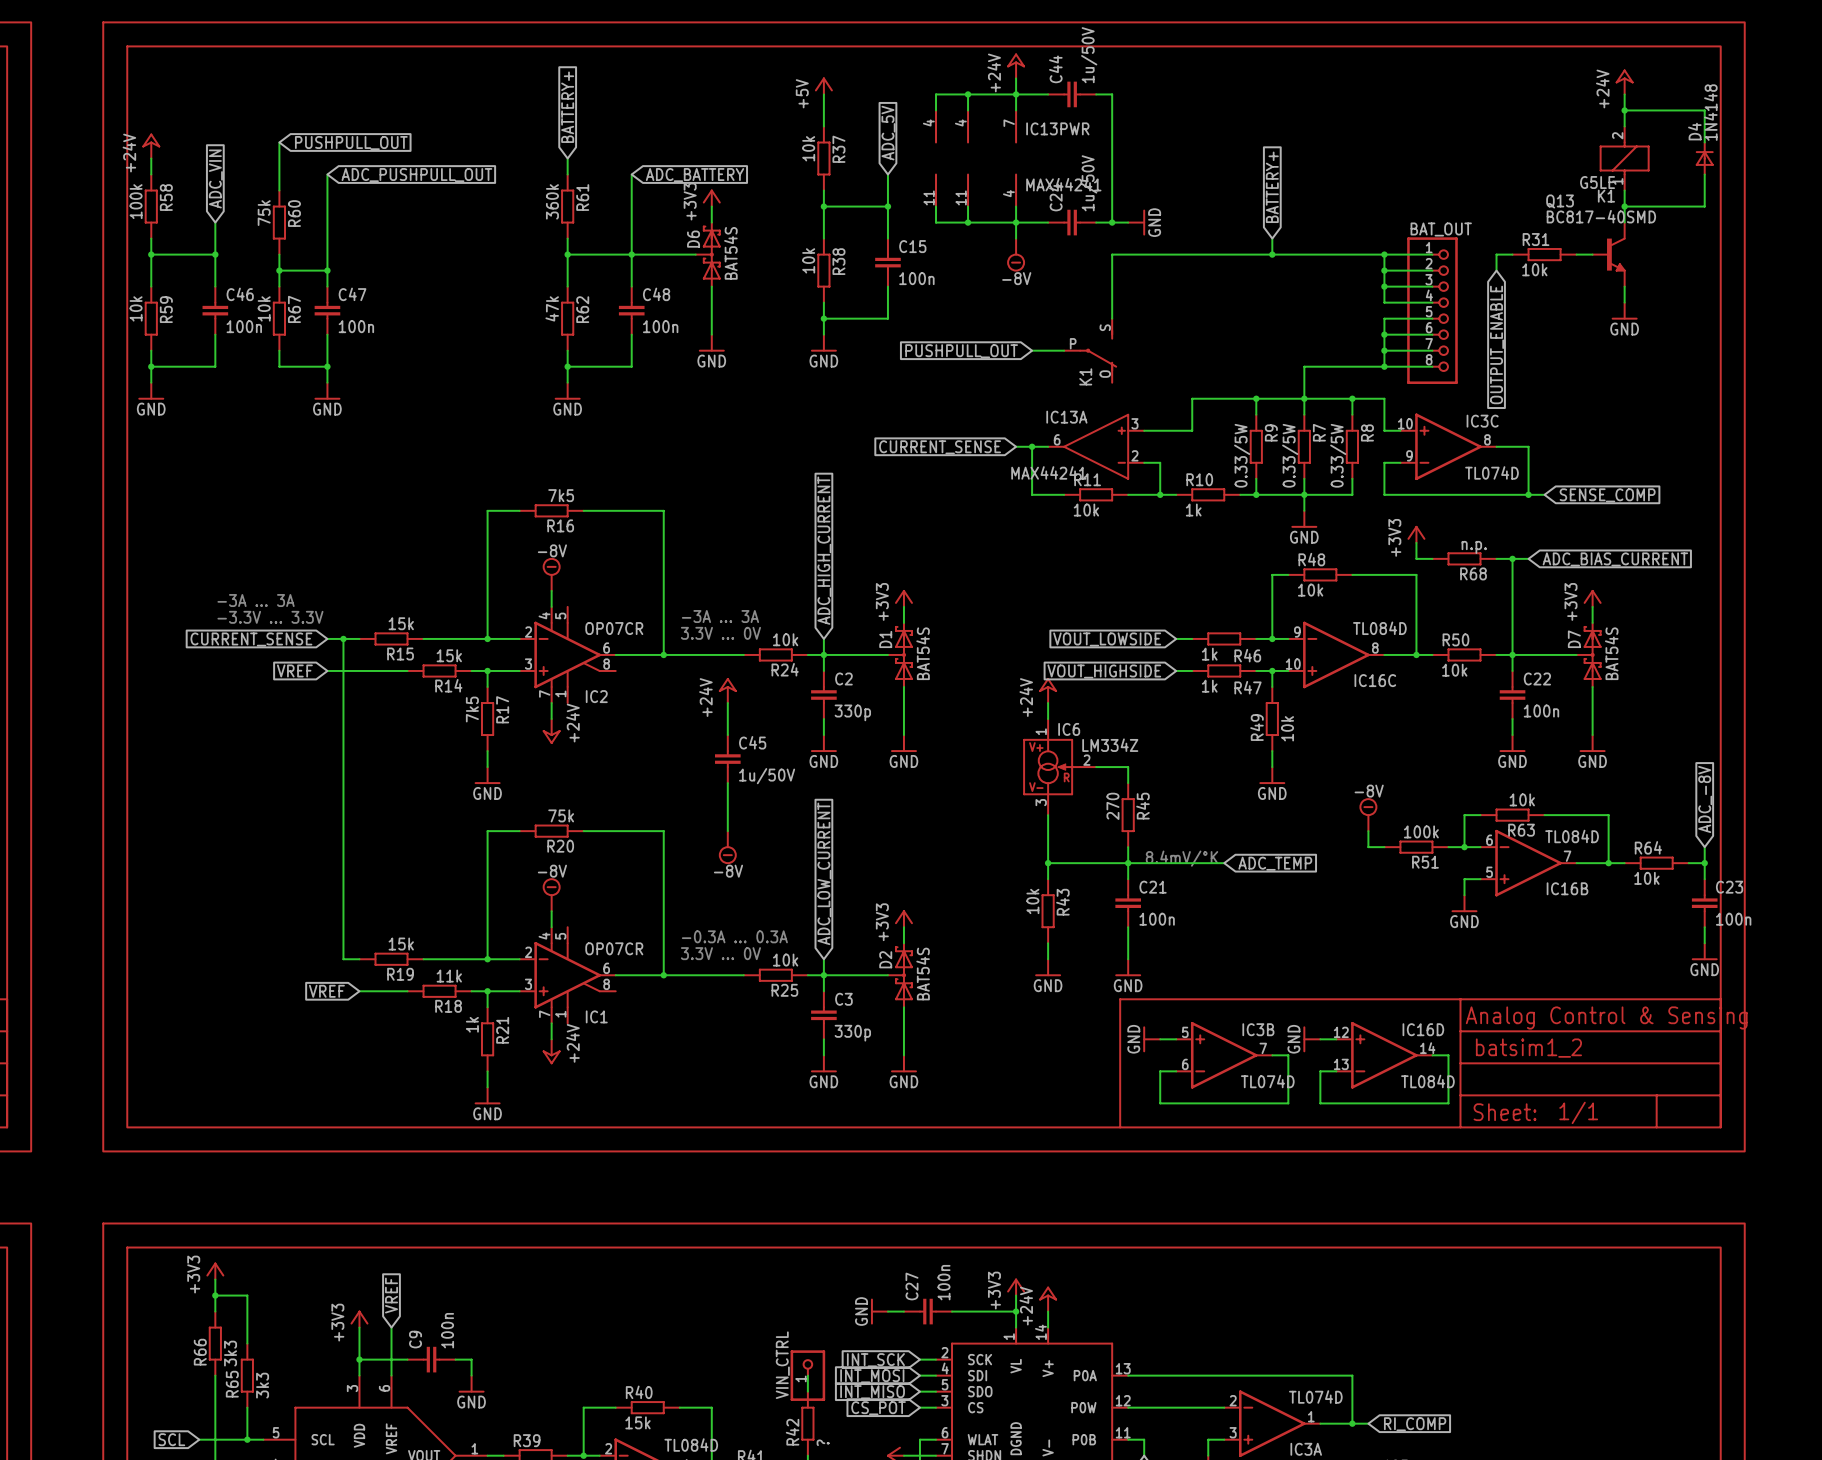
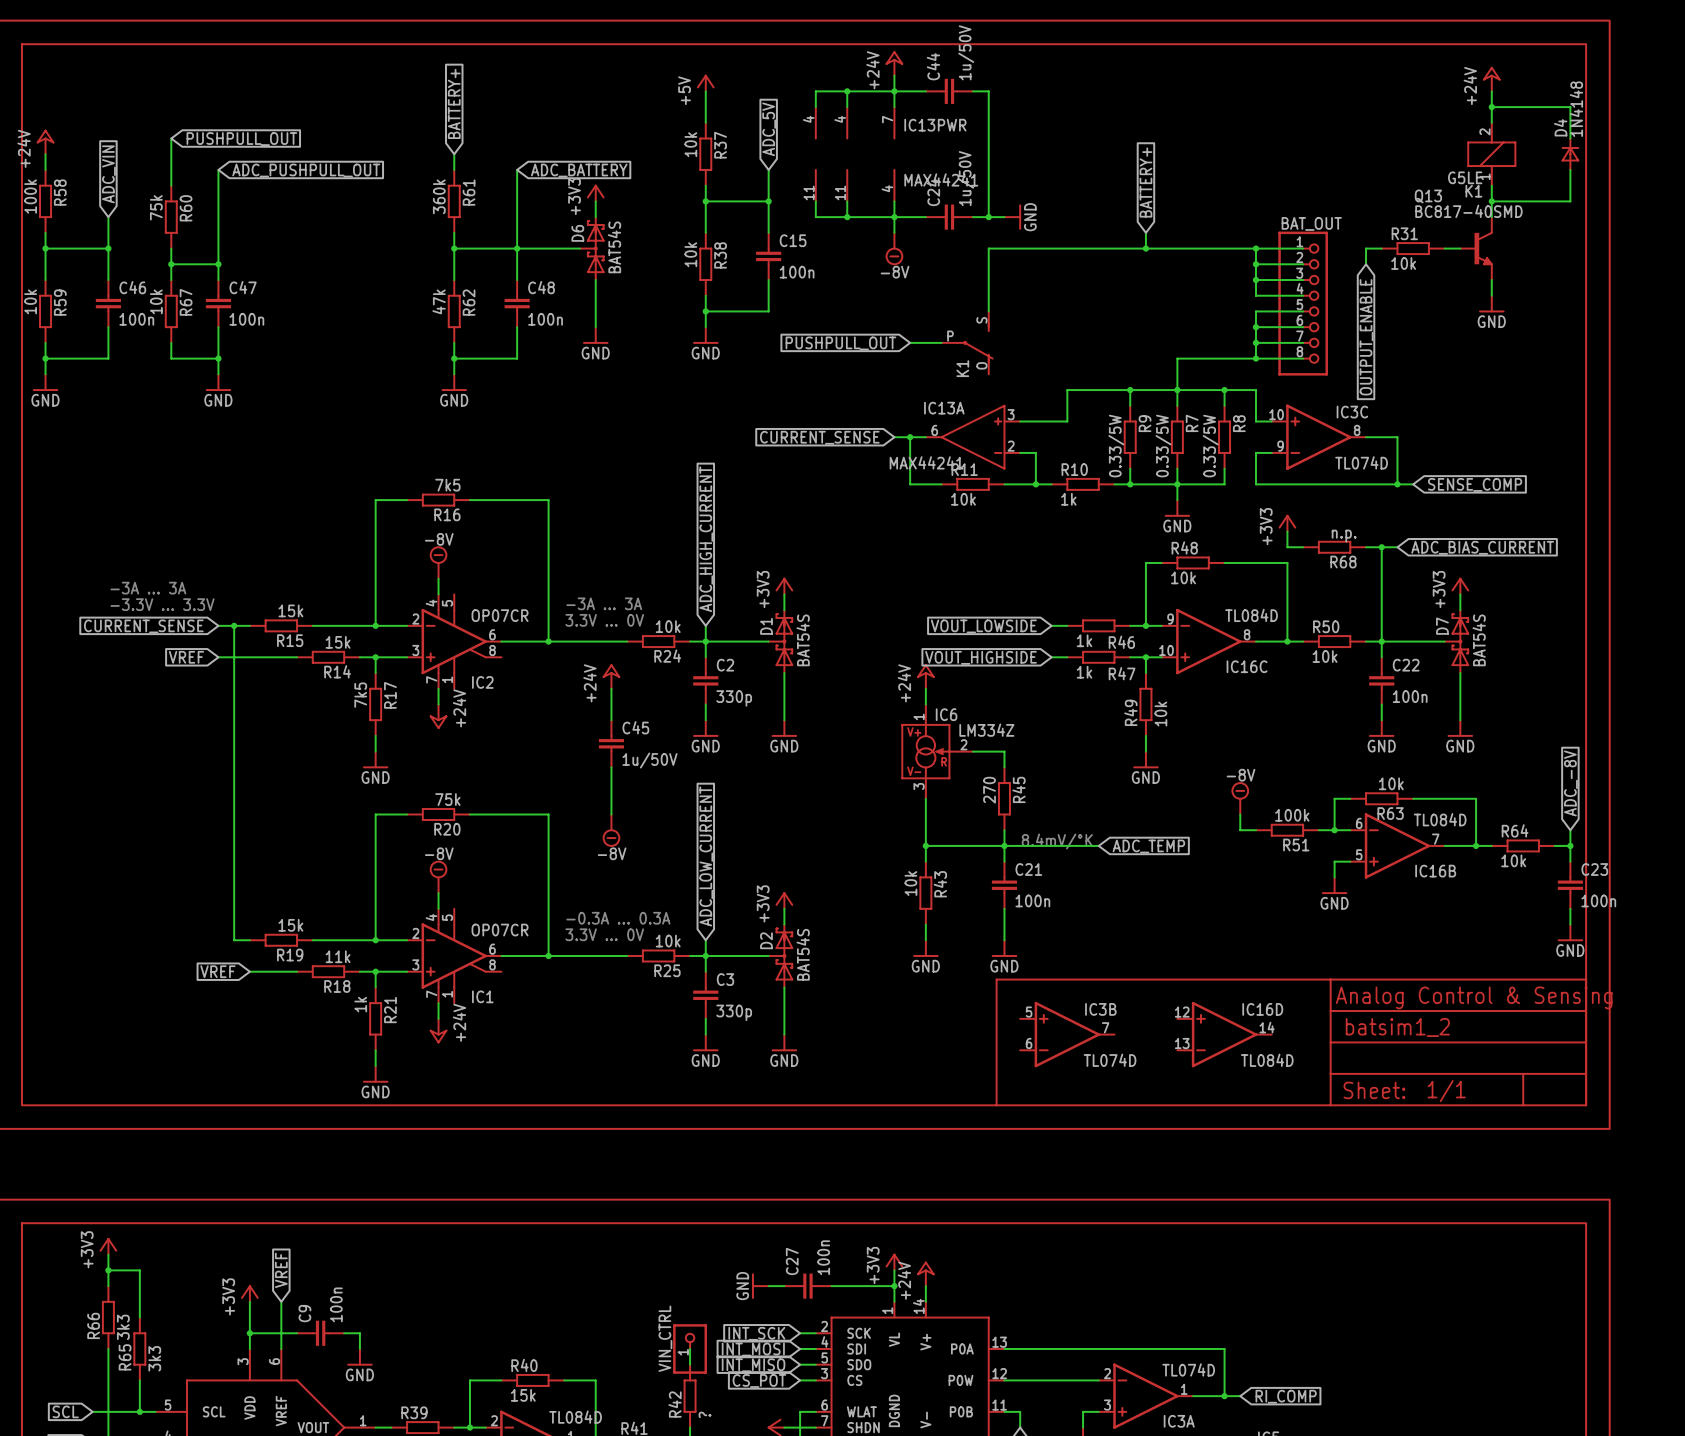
power symbol: GND (1151, 1039) -> none
power symbol: GND (1311, 1039) -> none
IC3B position: (1224, 1055) -> (1067, 1034)
wire: (1272, 1055) (1288, 1055) (1288, 1103) (1160, 1103) (1160, 1071) (1176, 1071) -> none
IC16D position: (1384, 1055) -> (1224, 1034)
wire: (1432, 1055) (1448, 1055) (1448, 1103) (1320, 1103) (1320, 1071) (1336, 1071) -> none

